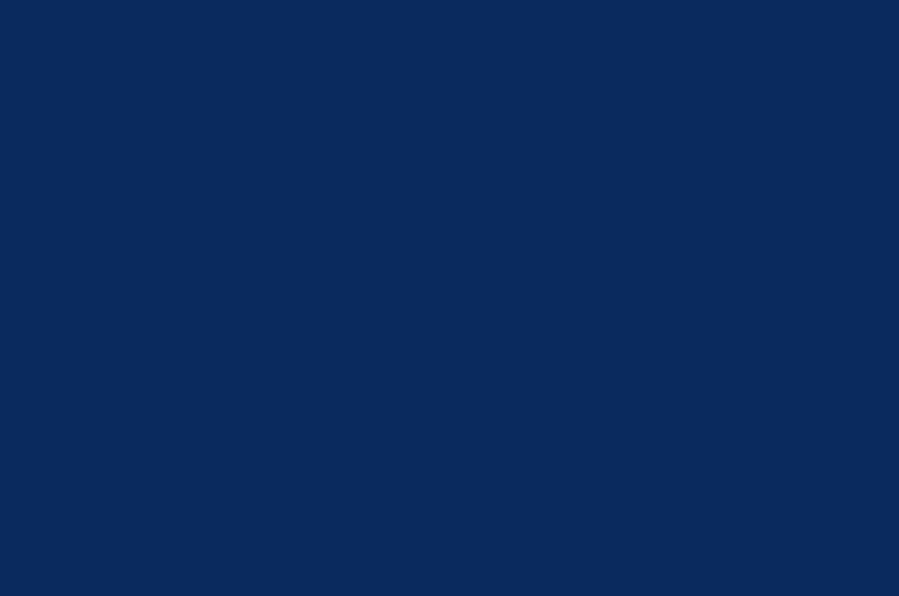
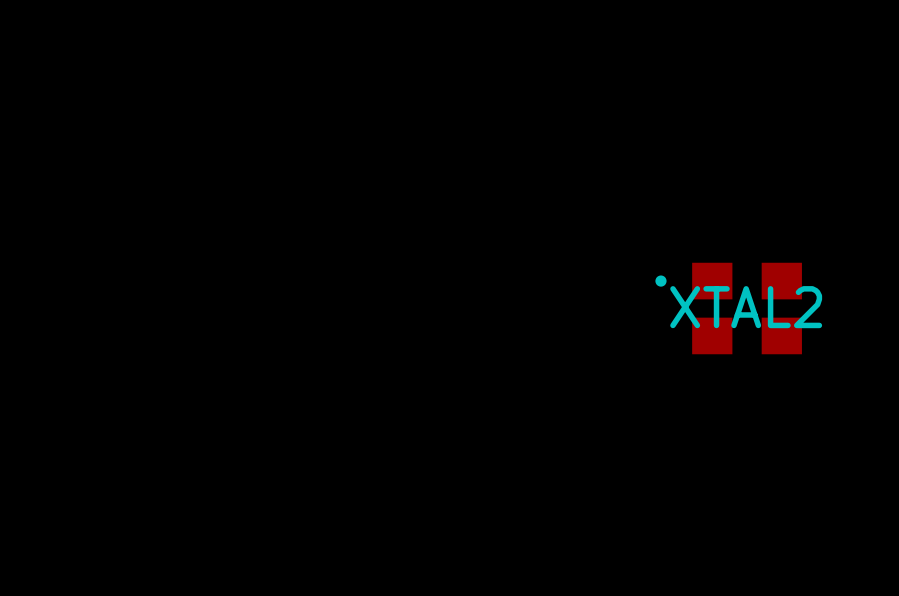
XTAL2: none -> (728, 308)

